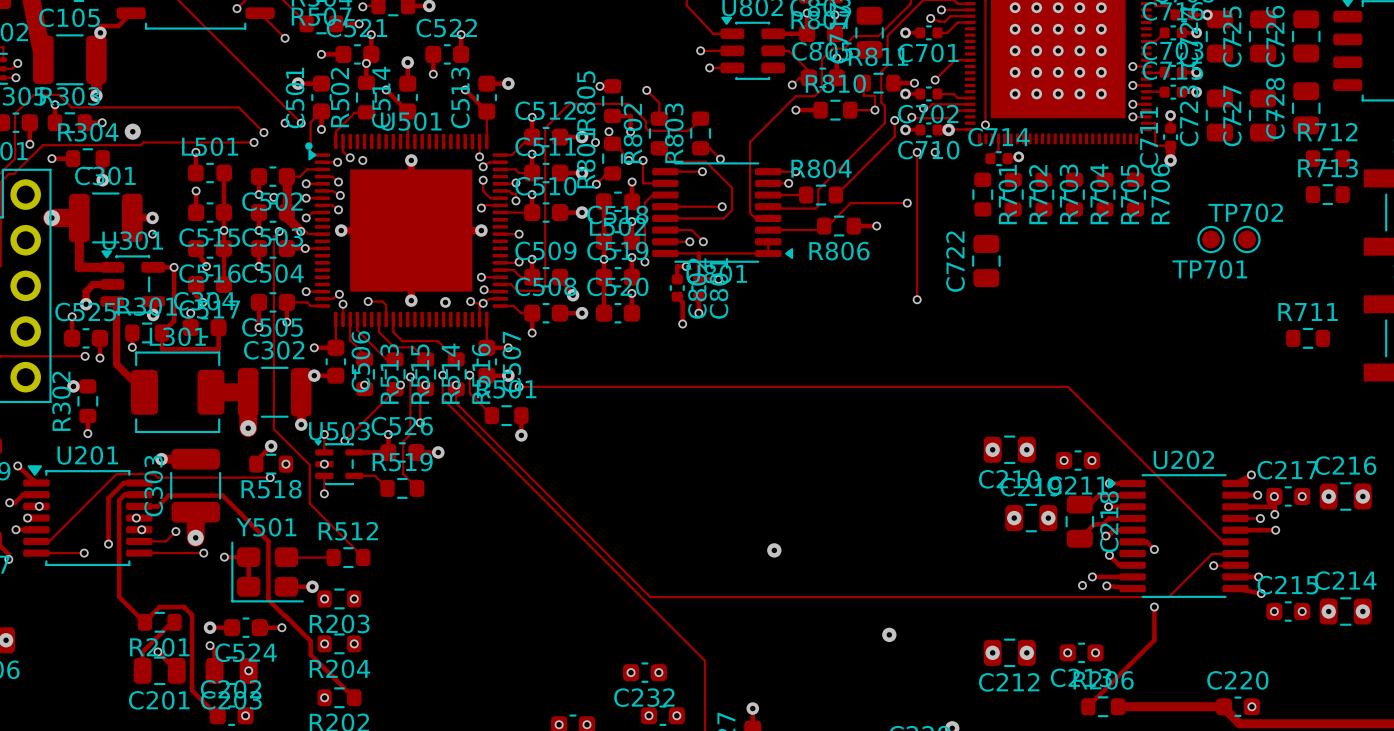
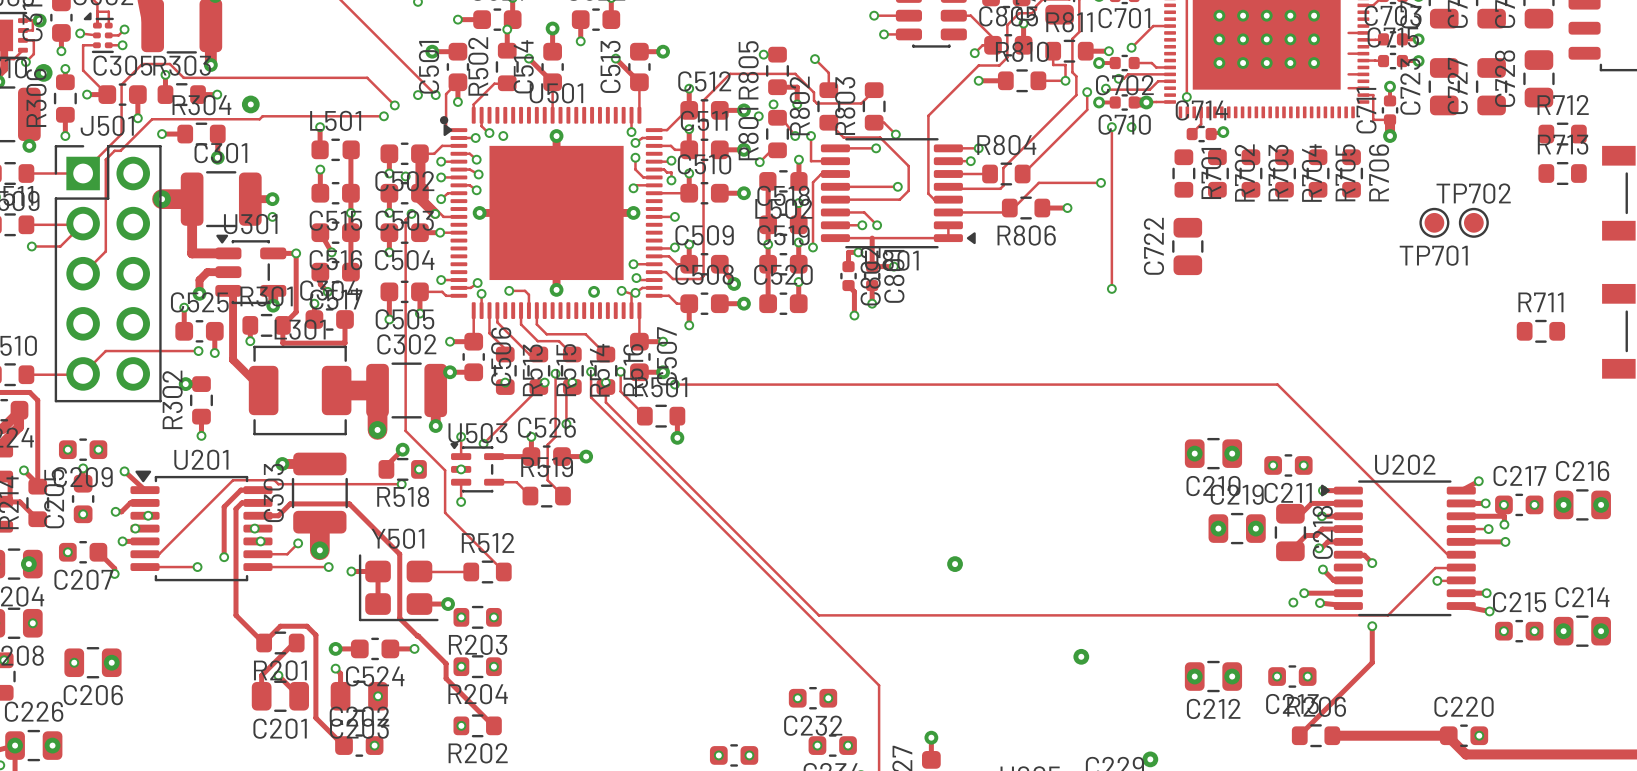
via: (1132, 66) -> none
via: (1132, 85) -> none
via: (1132, 104) -> none
via: (1132, 116) -> none

